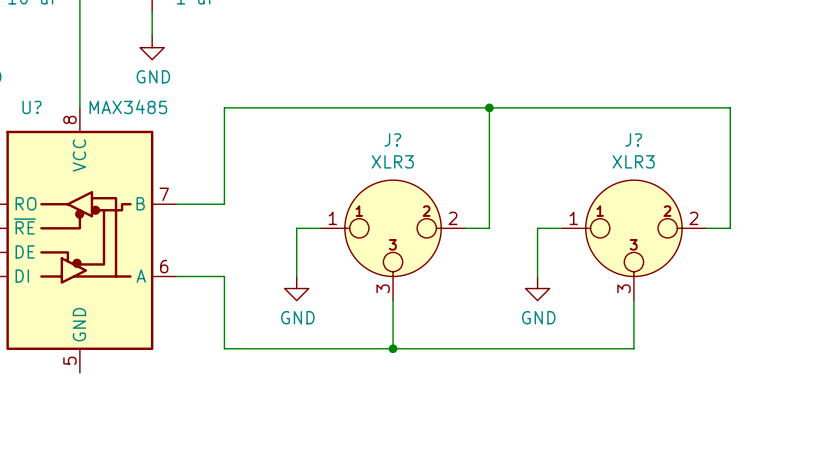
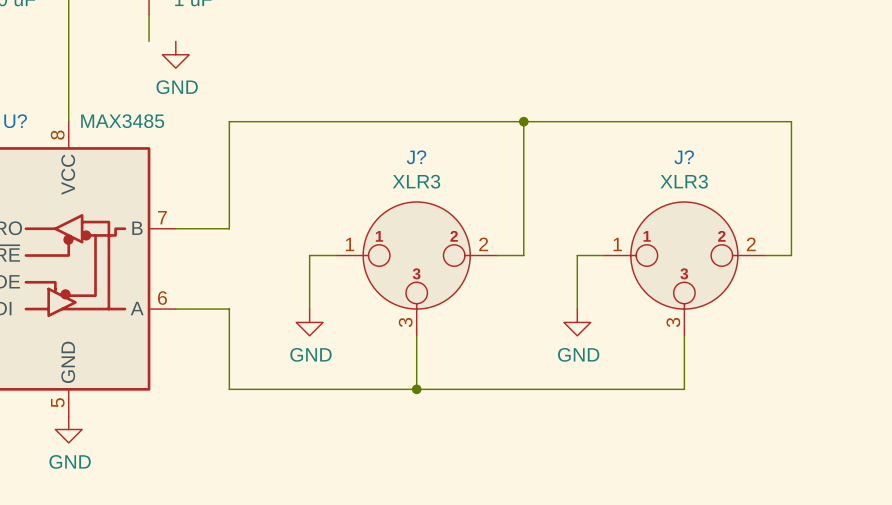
power symbol position: GND (152, 47) -> GND (175, 54)
power symbol: none -> GND (68, 429)

